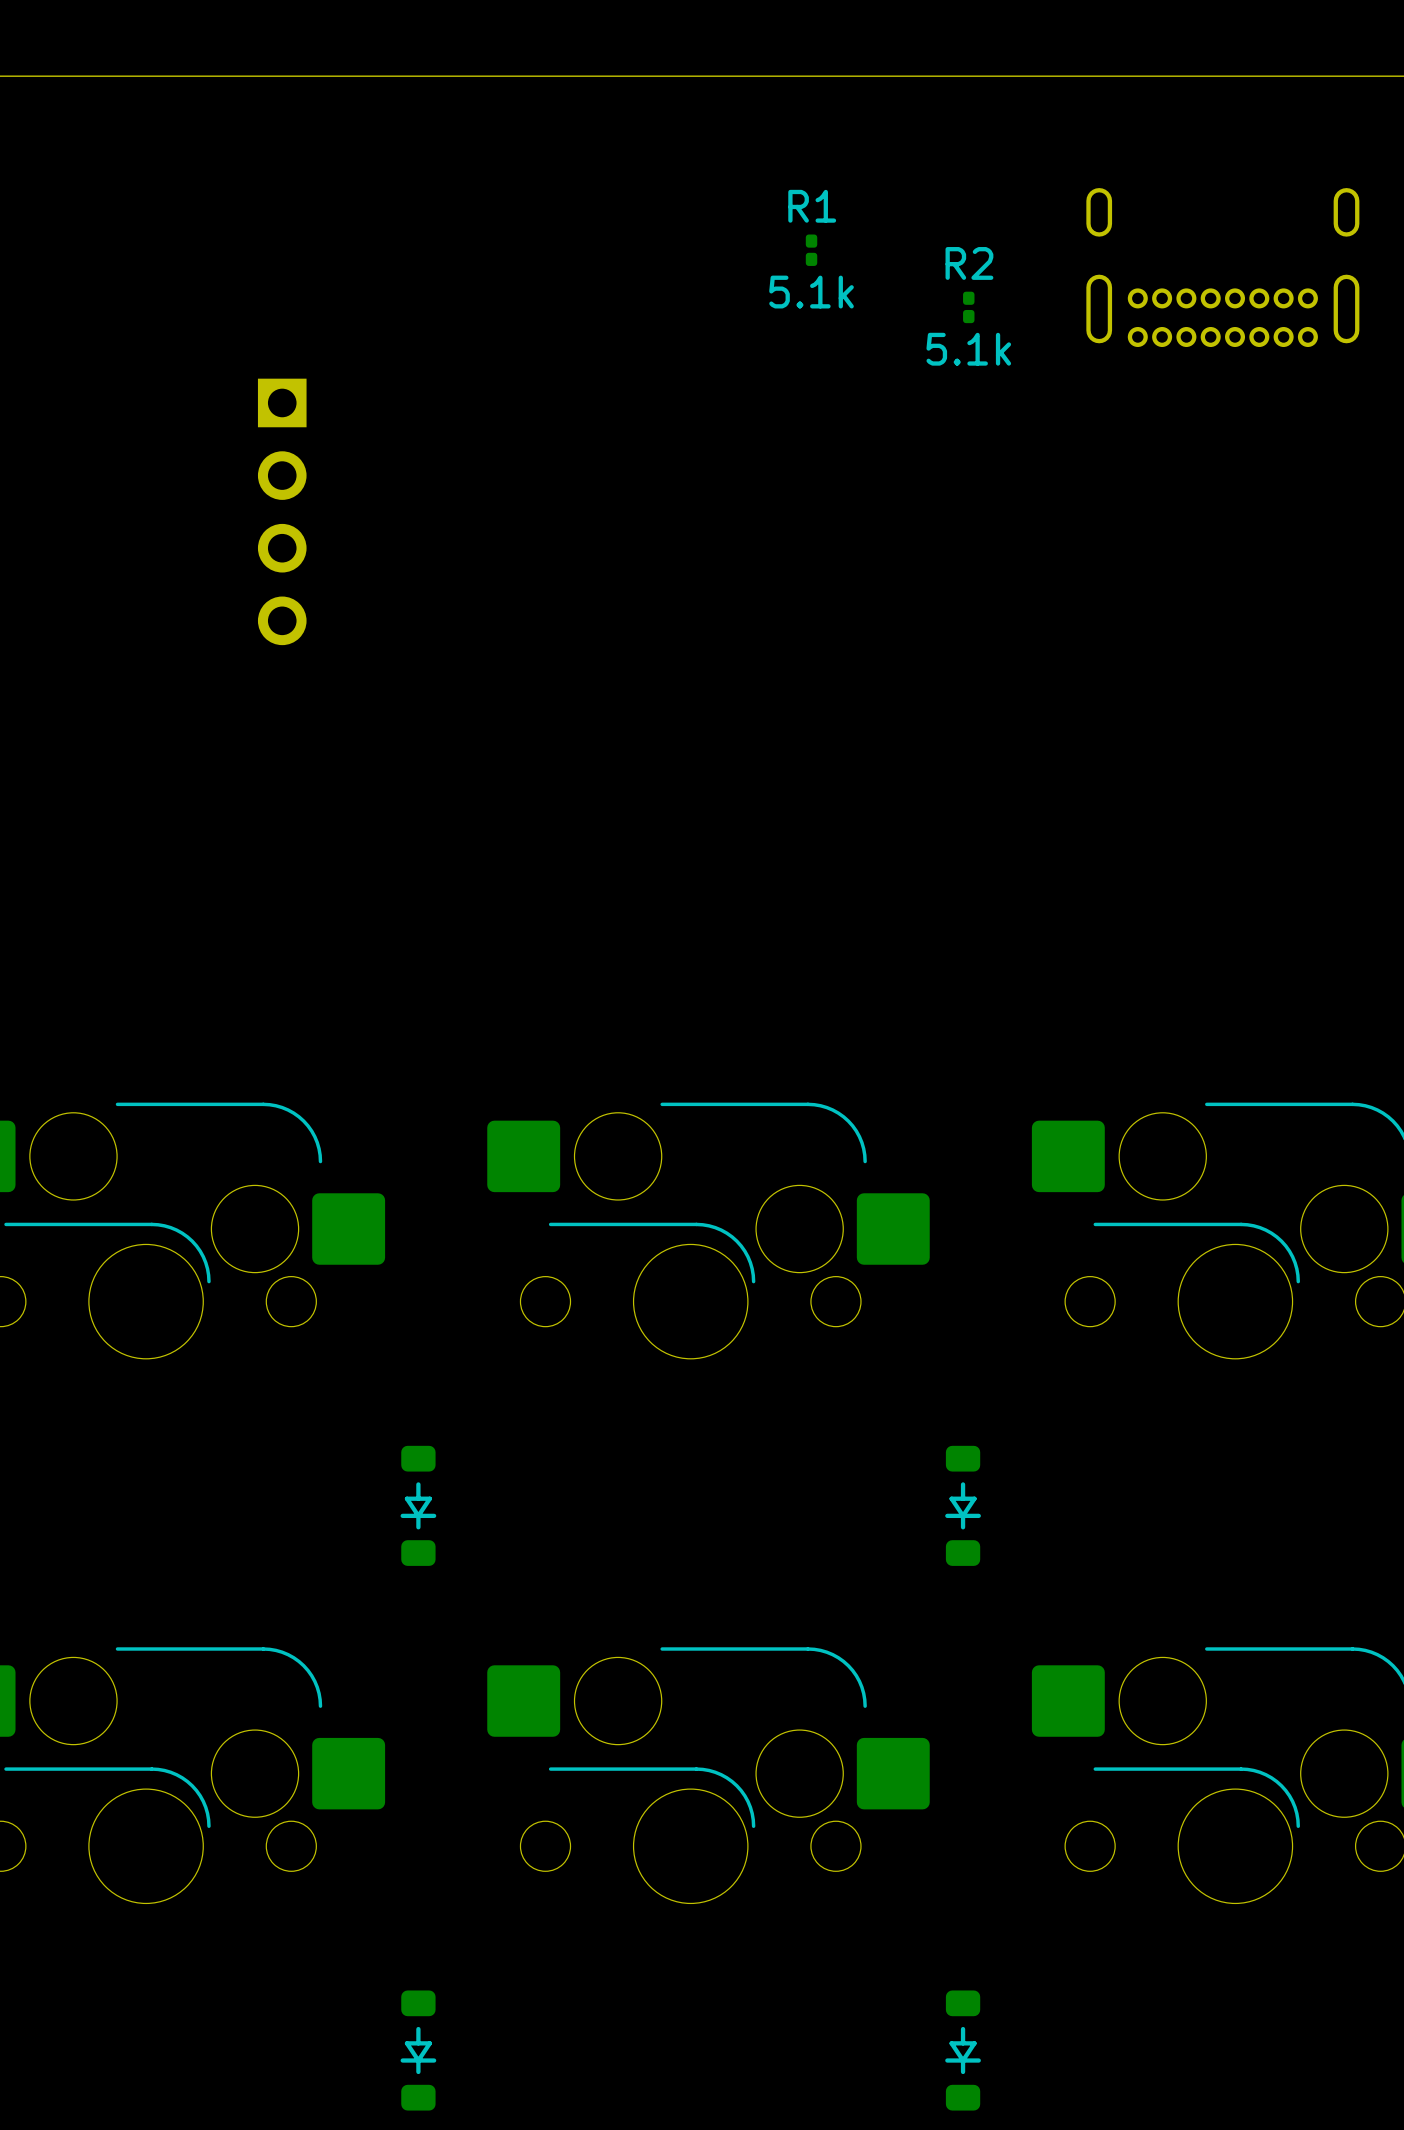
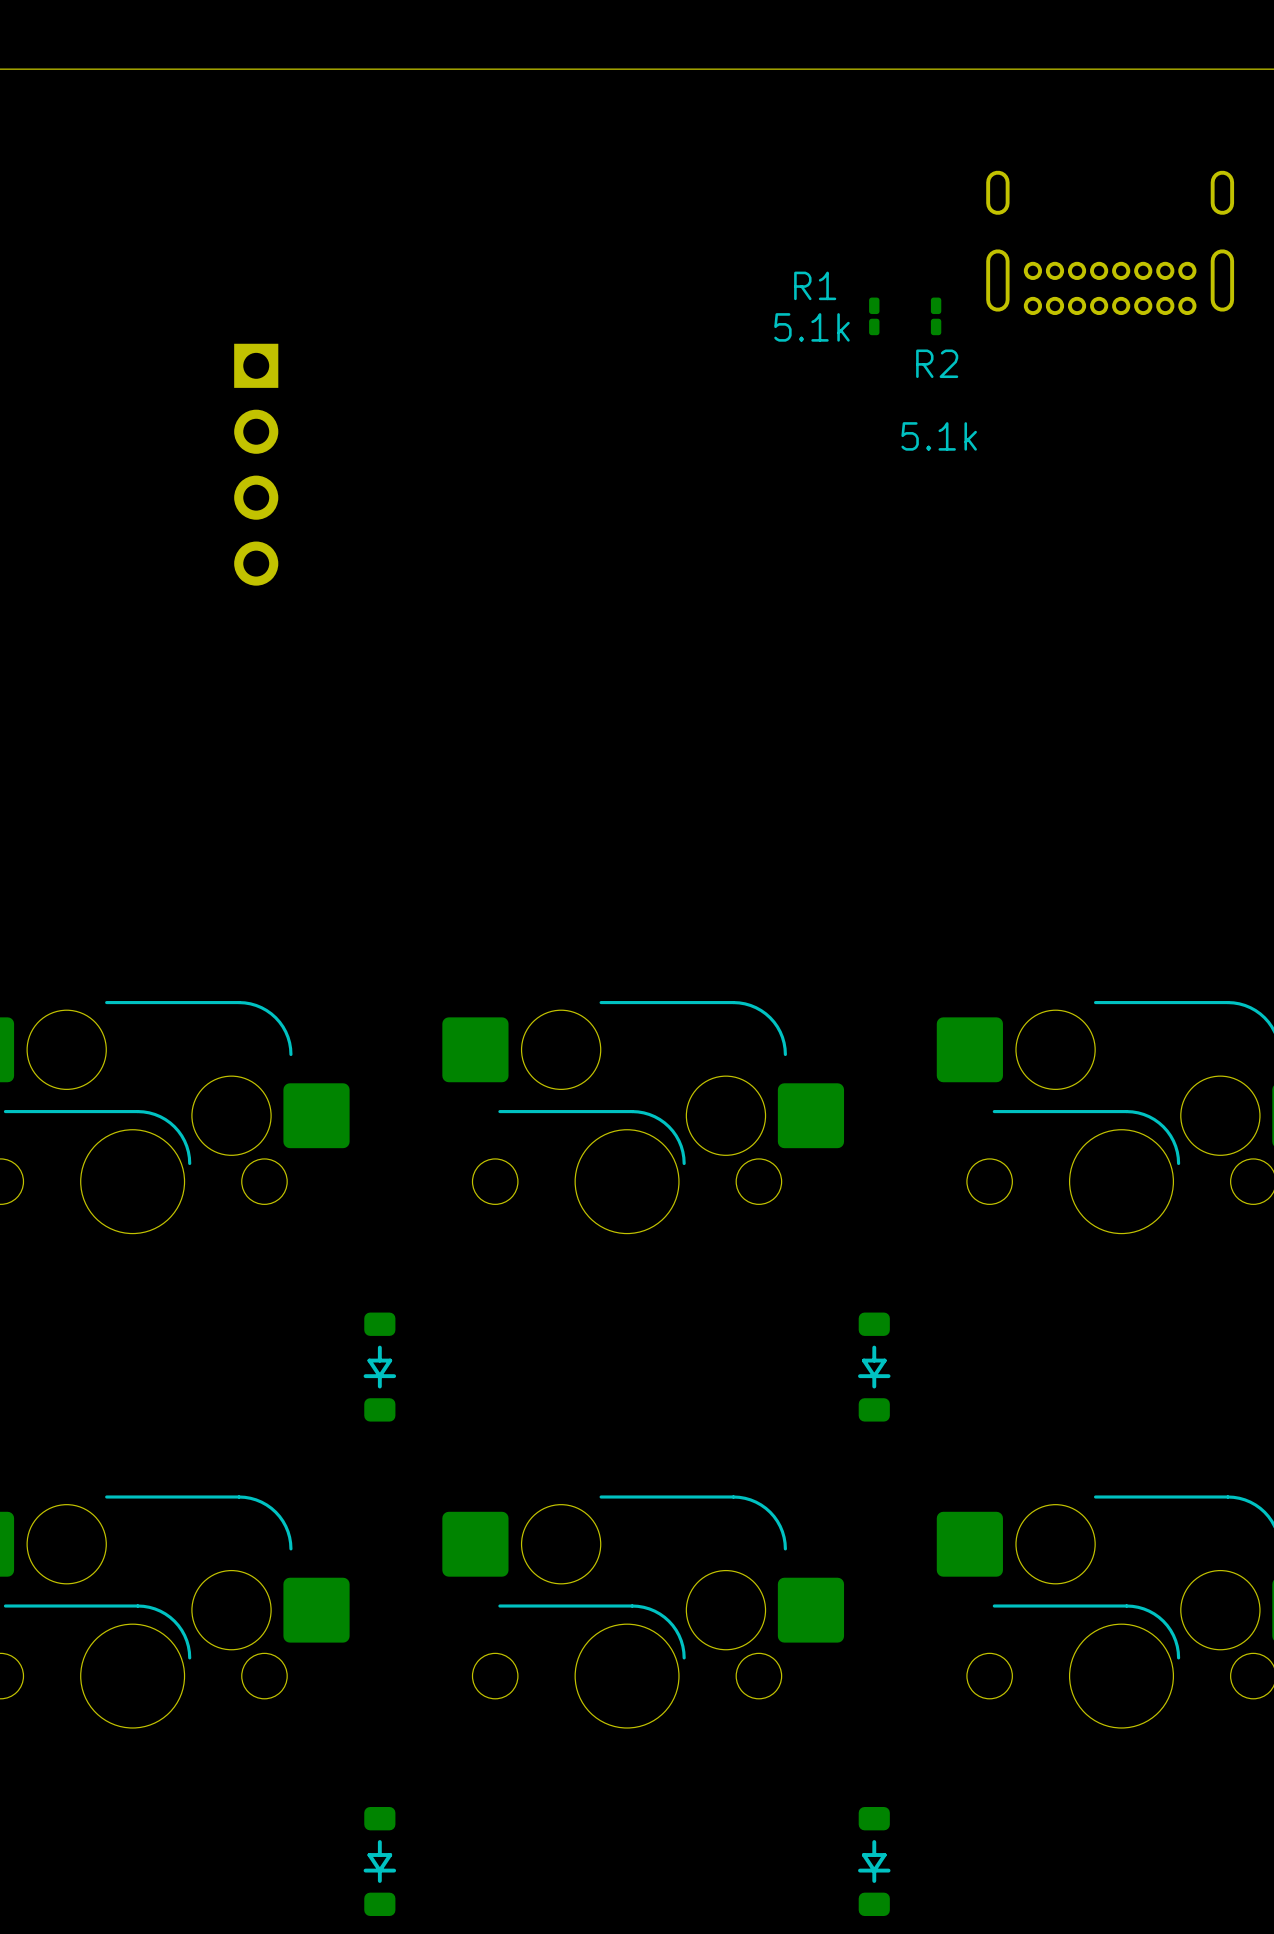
R1 name position: R1 (812, 206) -> R1 (815, 285)
R1 footprint: [805, 234, 818, 266] -> [869, 297, 880, 336]
R2 name position: R2 (969, 263) -> R2 (937, 363)
R2 footprint: [963, 291, 975, 324] -> [930, 297, 942, 336]
R1 value position: 5.1k (811, 292) -> 5.1k (811, 327)
R2 value position: 5.1k (968, 349) -> 5.1k (939, 436)

